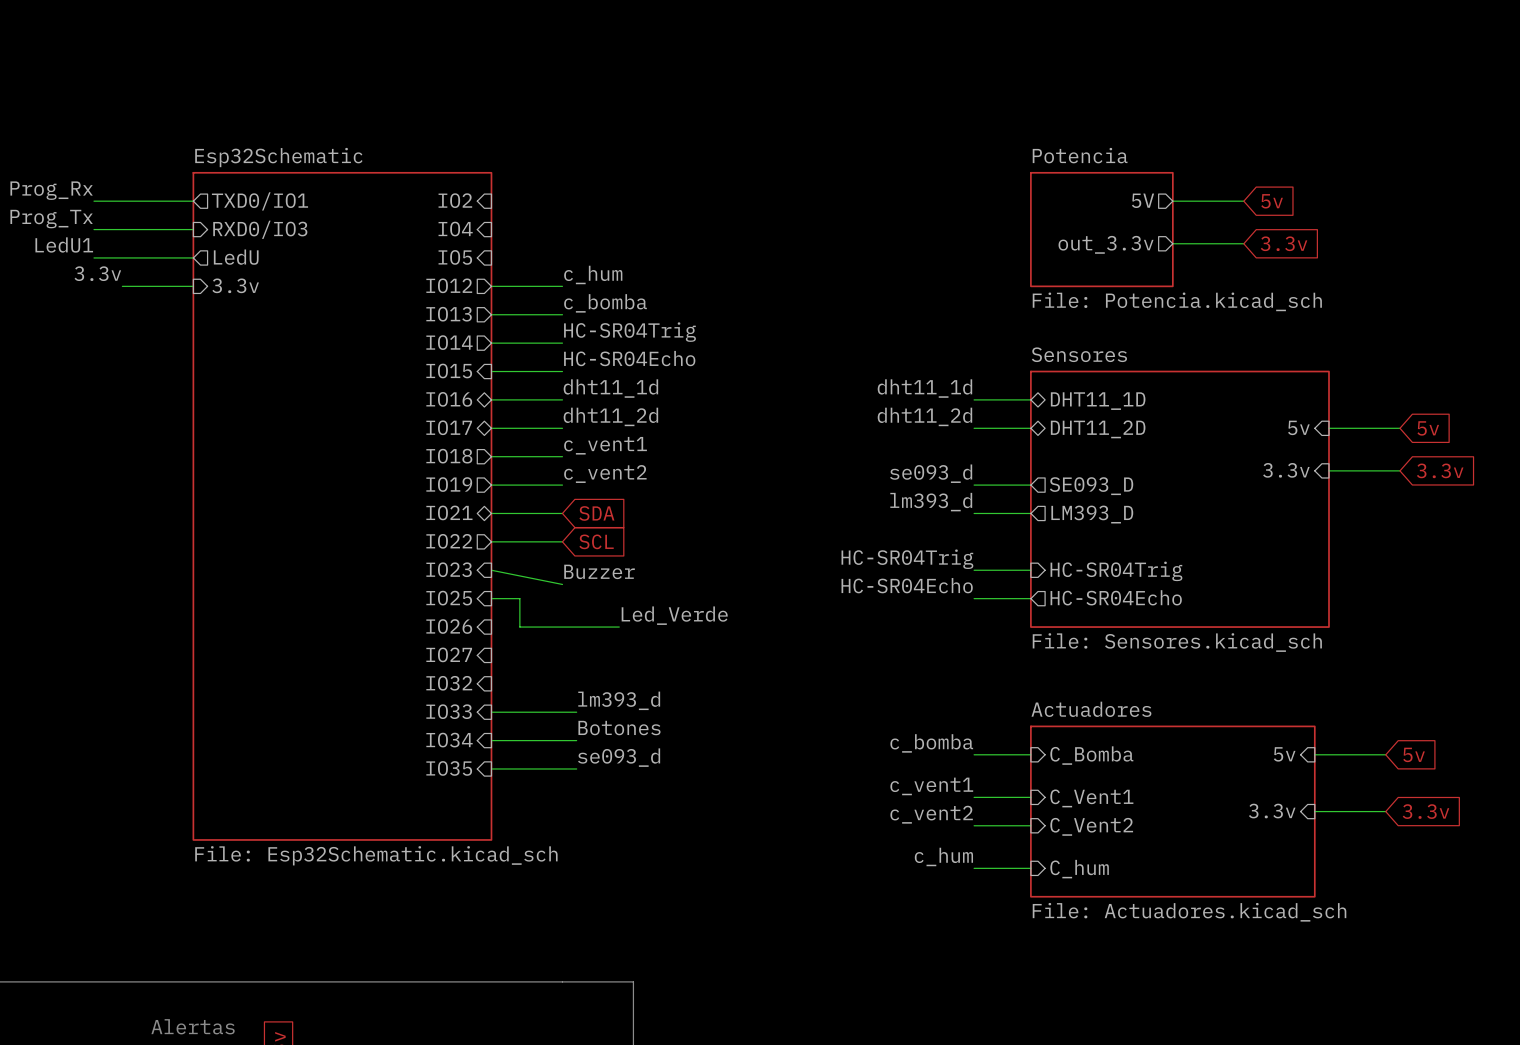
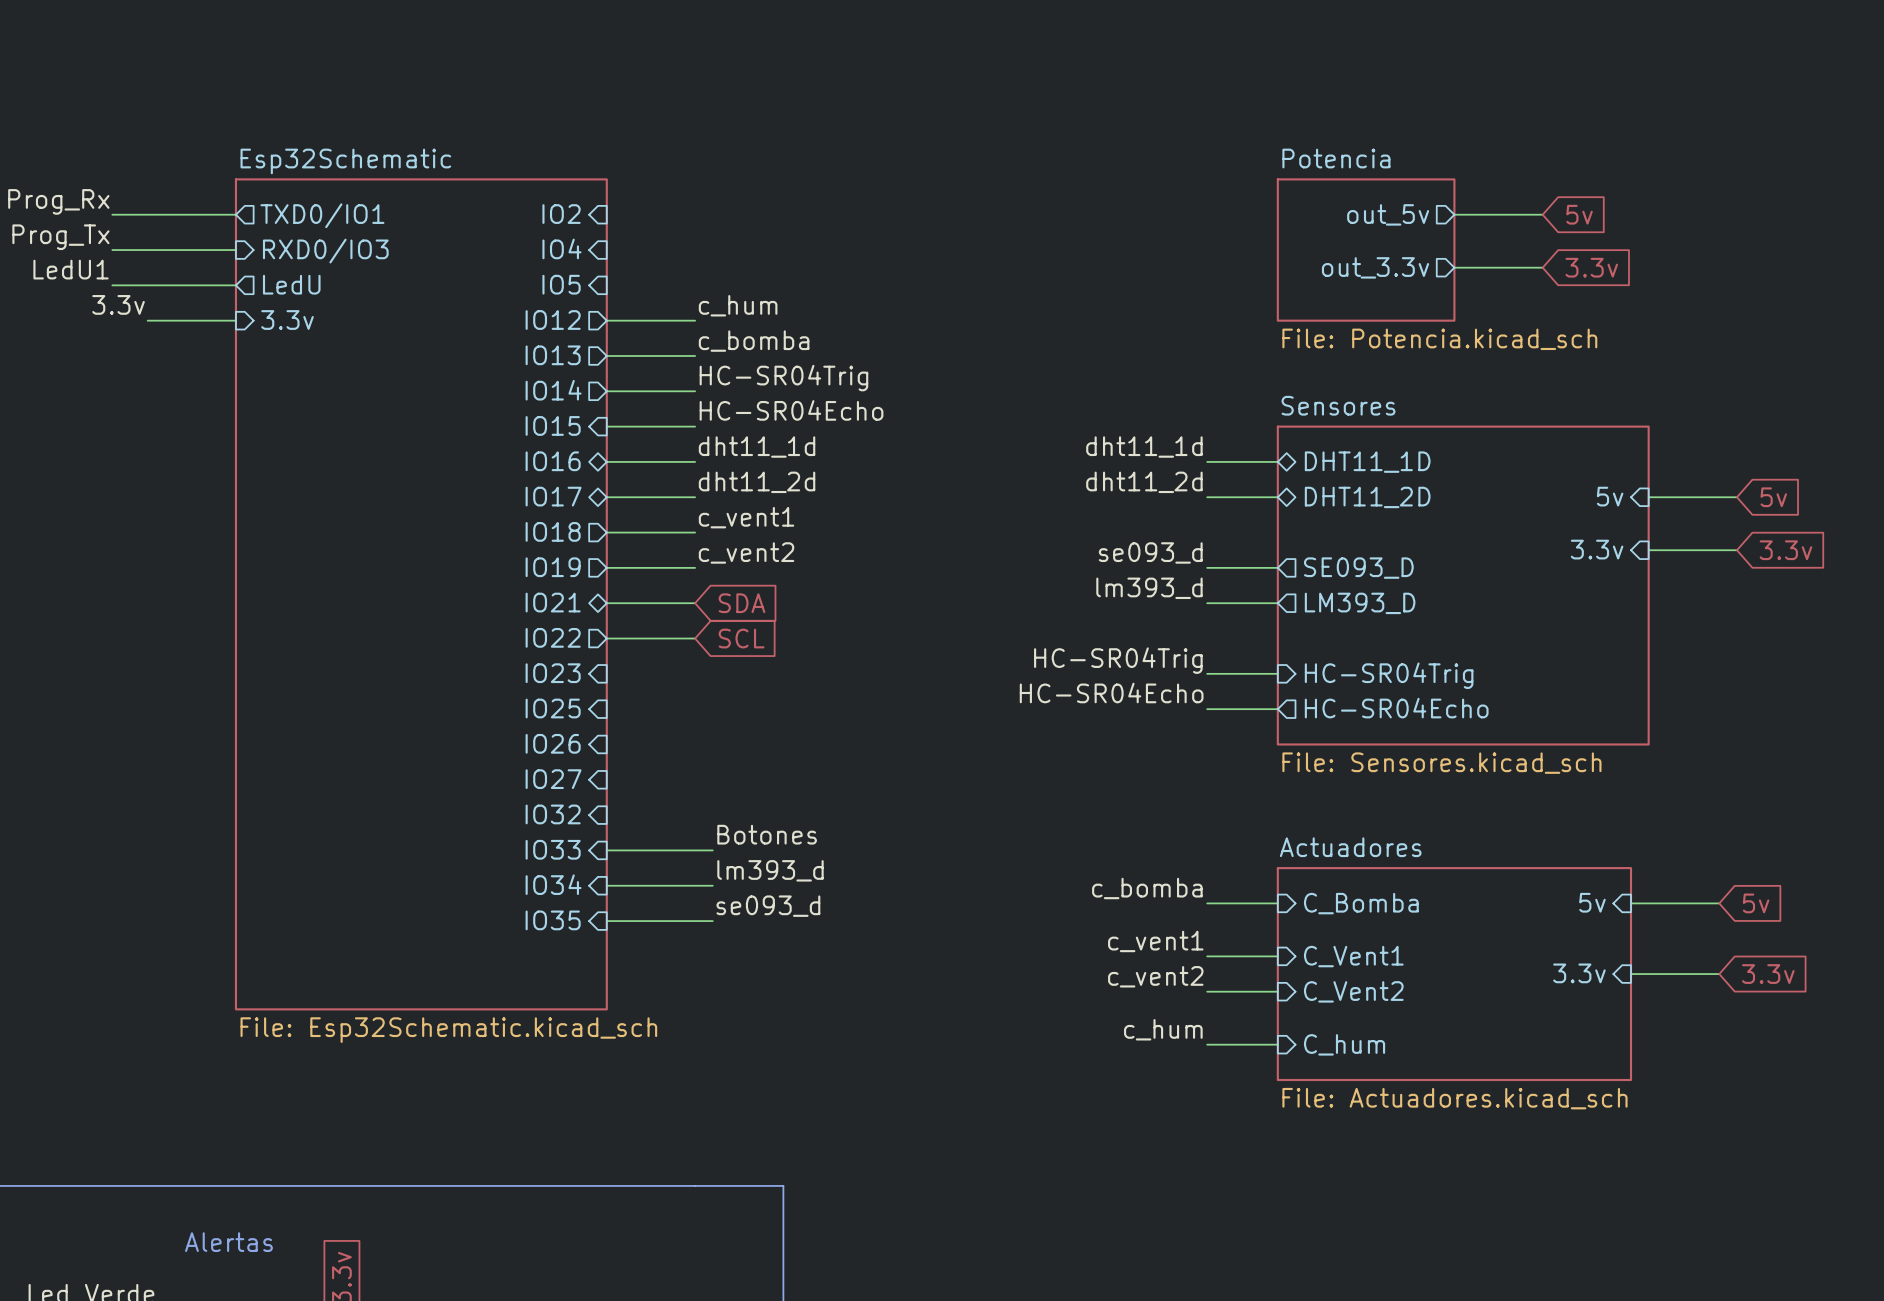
sheet pin: 5V (1142, 200) -> out_5v (1388, 214)
wire: (491, 570) (562, 584) -> none
label: Buzzer (599, 571) -> none
wire: (491, 598) (519, 598) (519, 627) (619, 627) -> none
label: Led_Verde (674, 615) -> none
label: lm393_d (619, 700) -> Botones (767, 834)
label: Botones (619, 728) -> lm393_d (770, 870)

